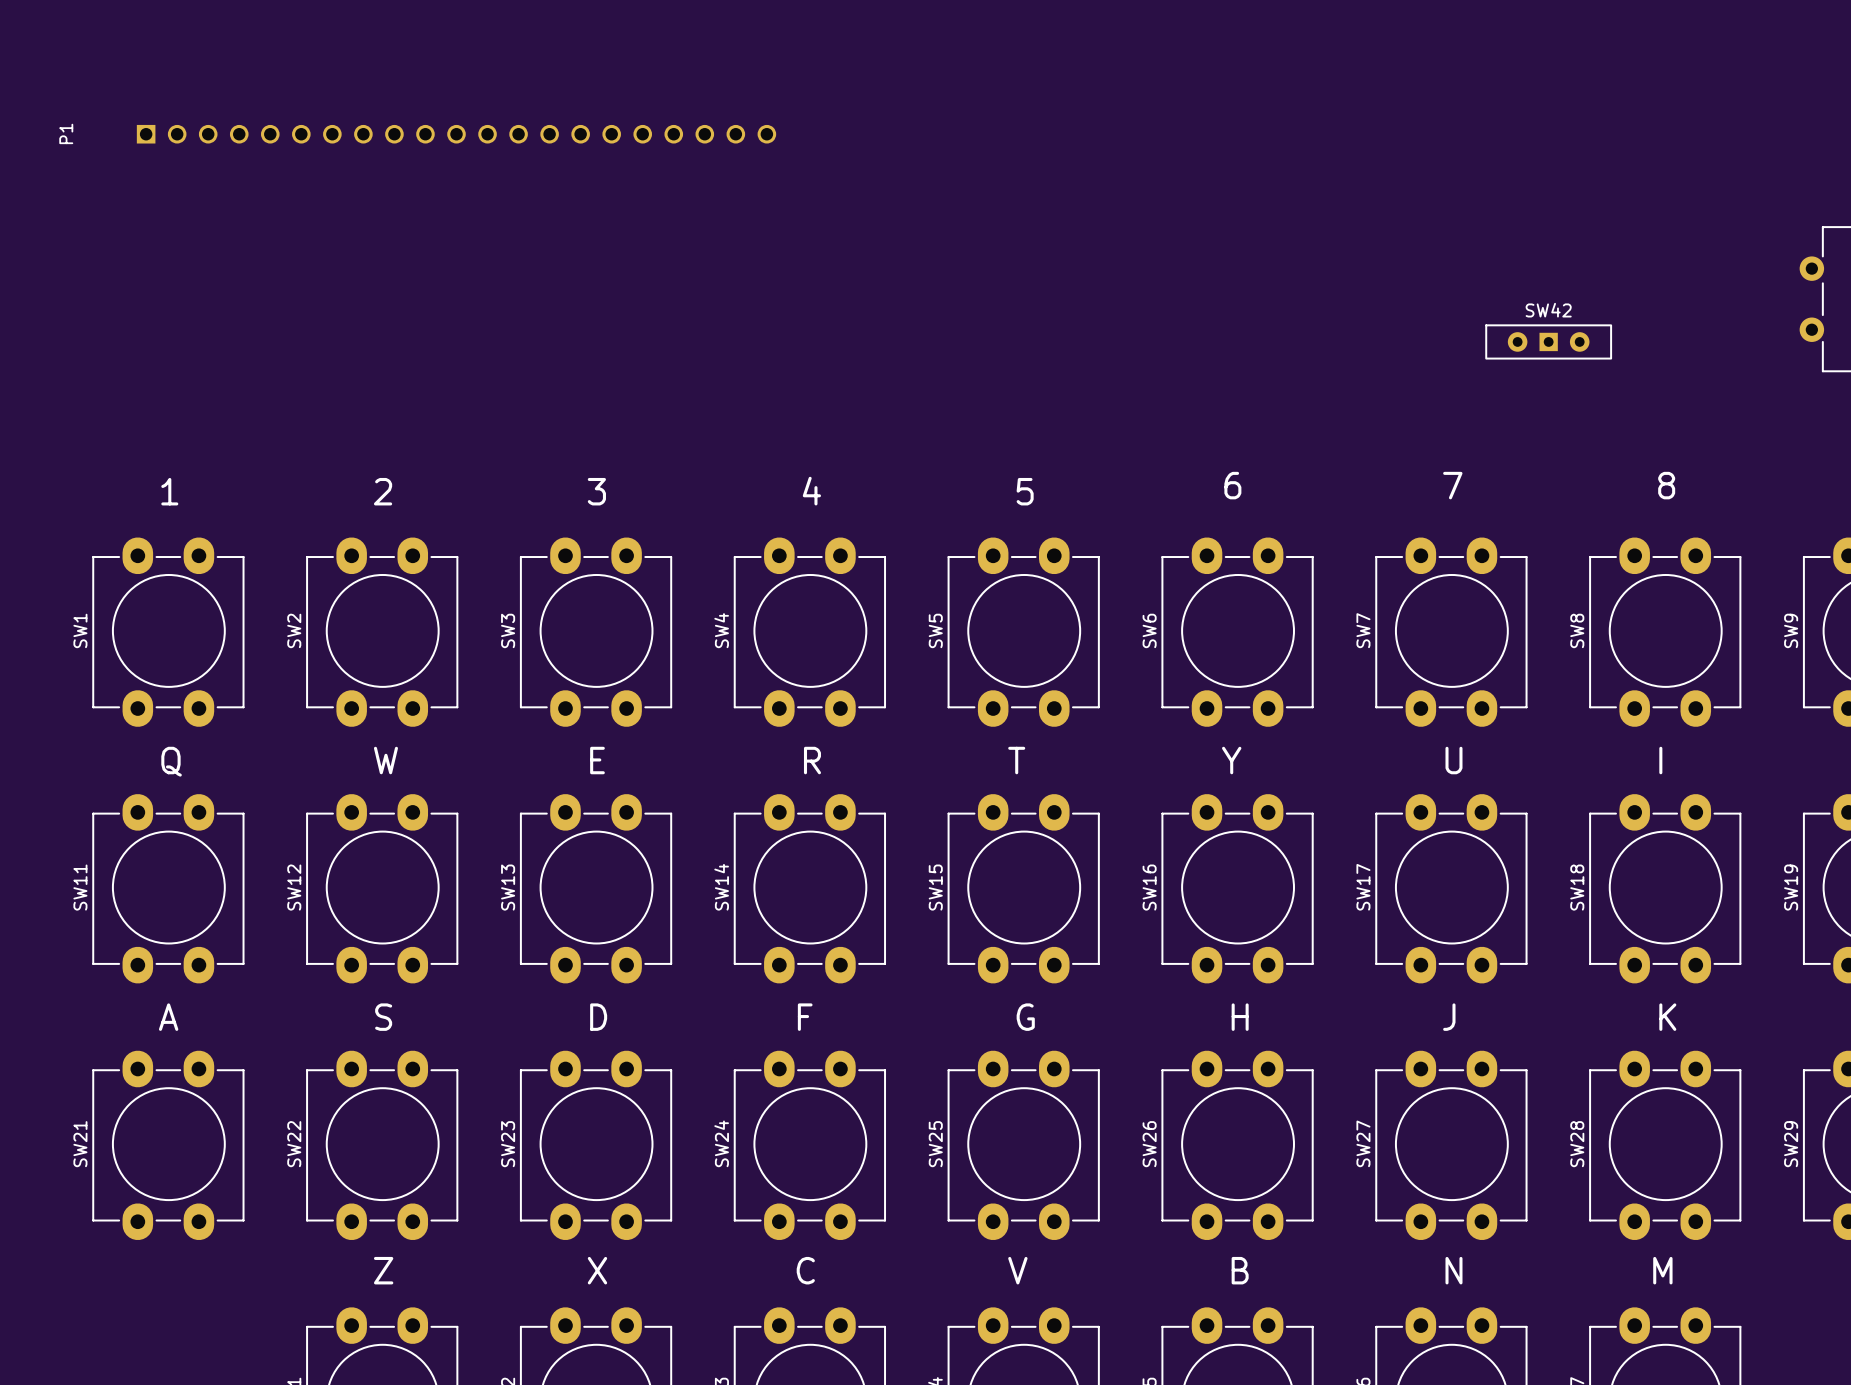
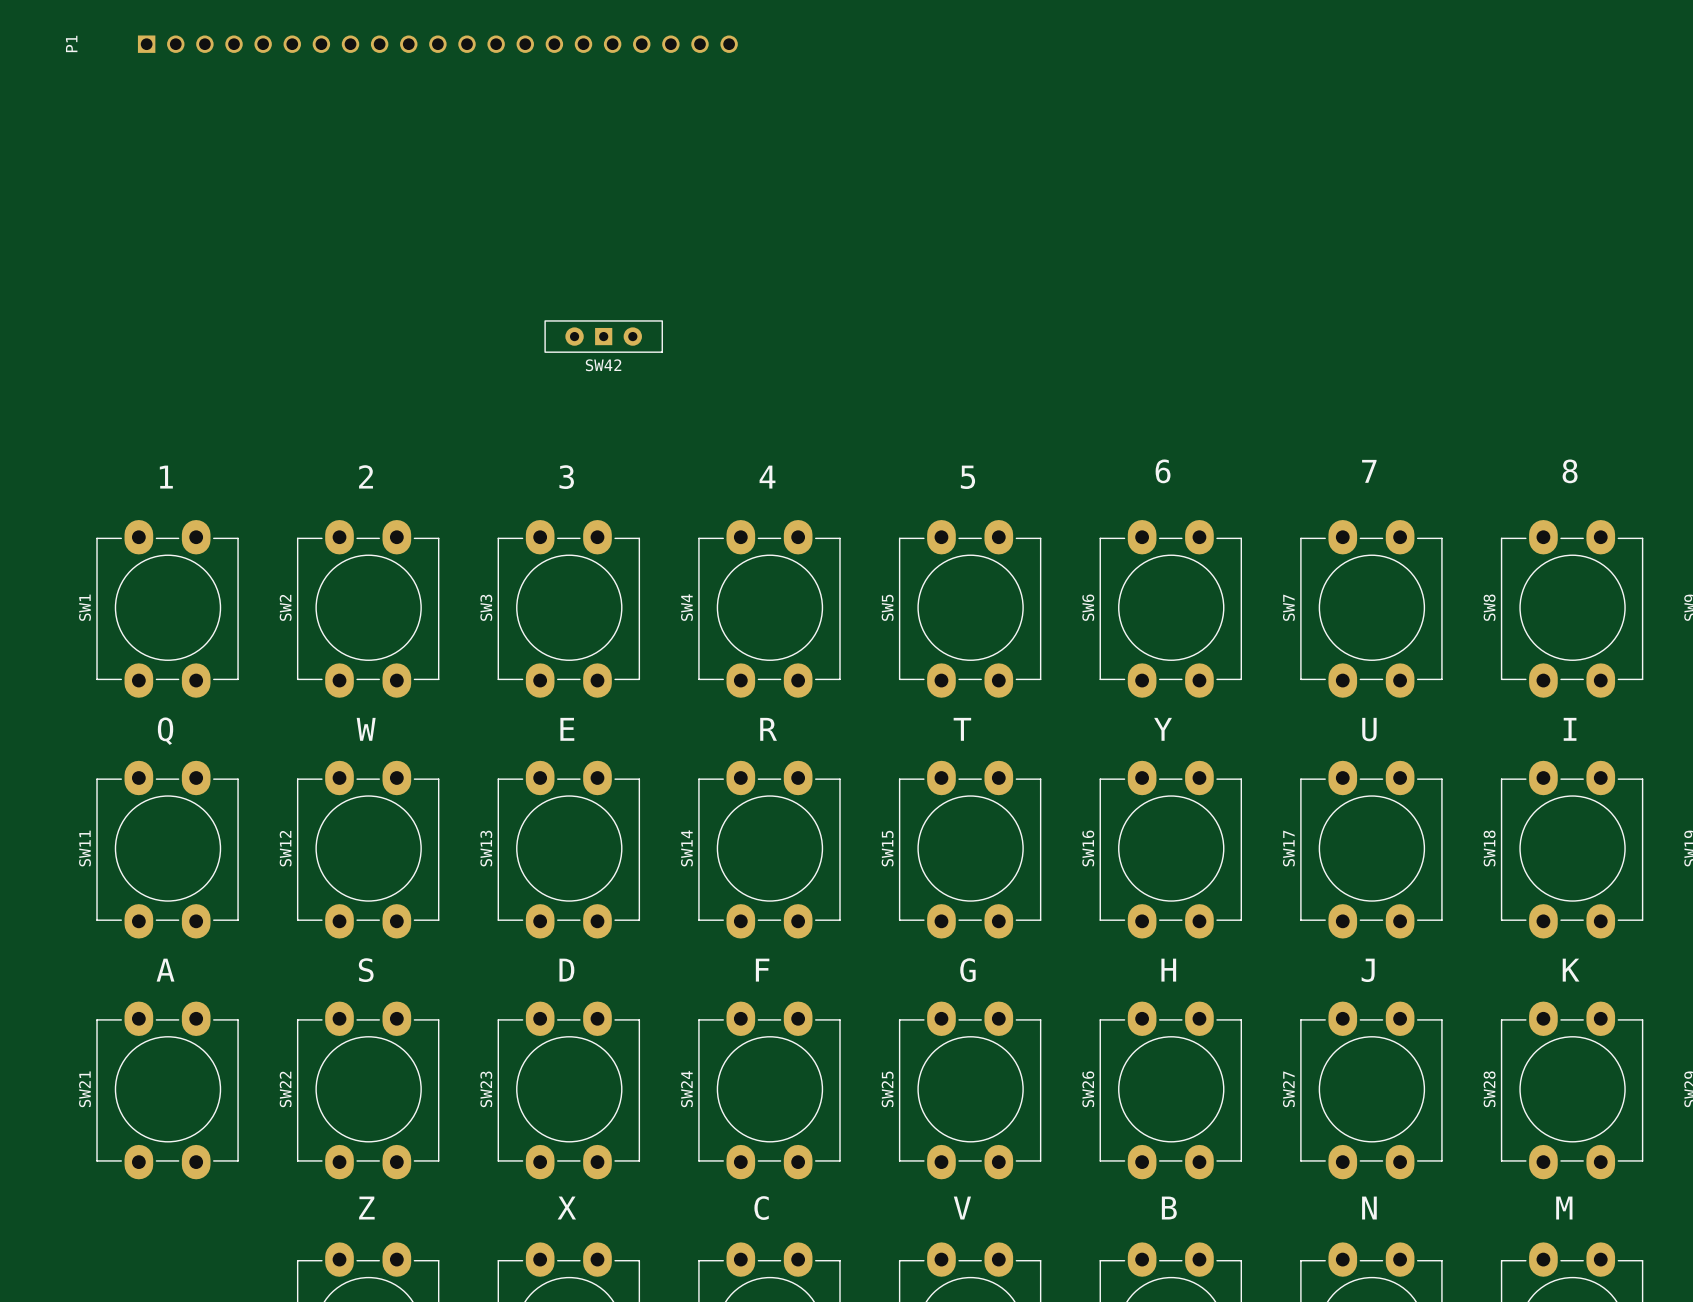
P1 position: (456, 134) -> (437, 44)
SW42 name position: SW42 (1548, 310) -> SW42 (603, 365)
SW42 position: (1548, 341) -> (603, 336)

